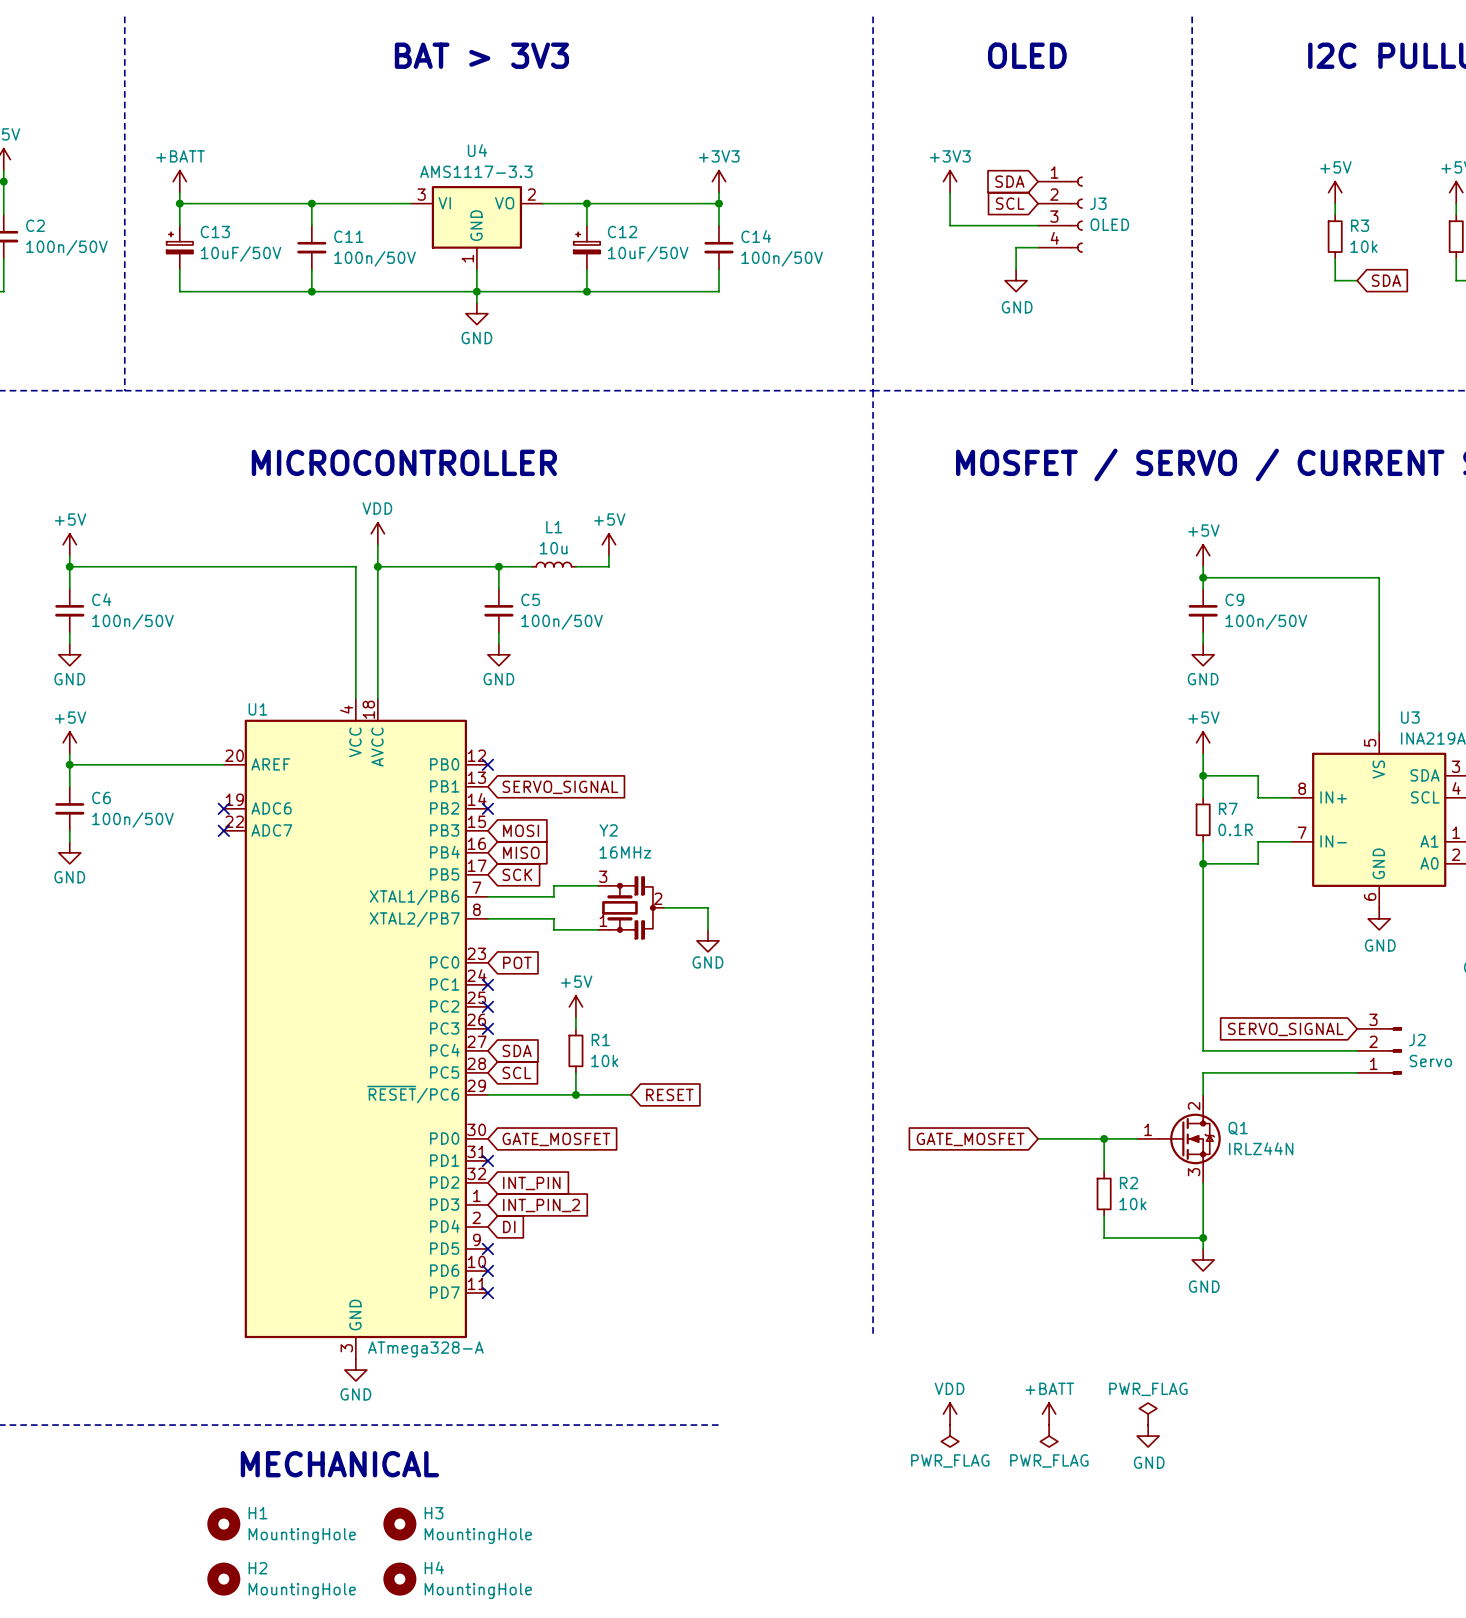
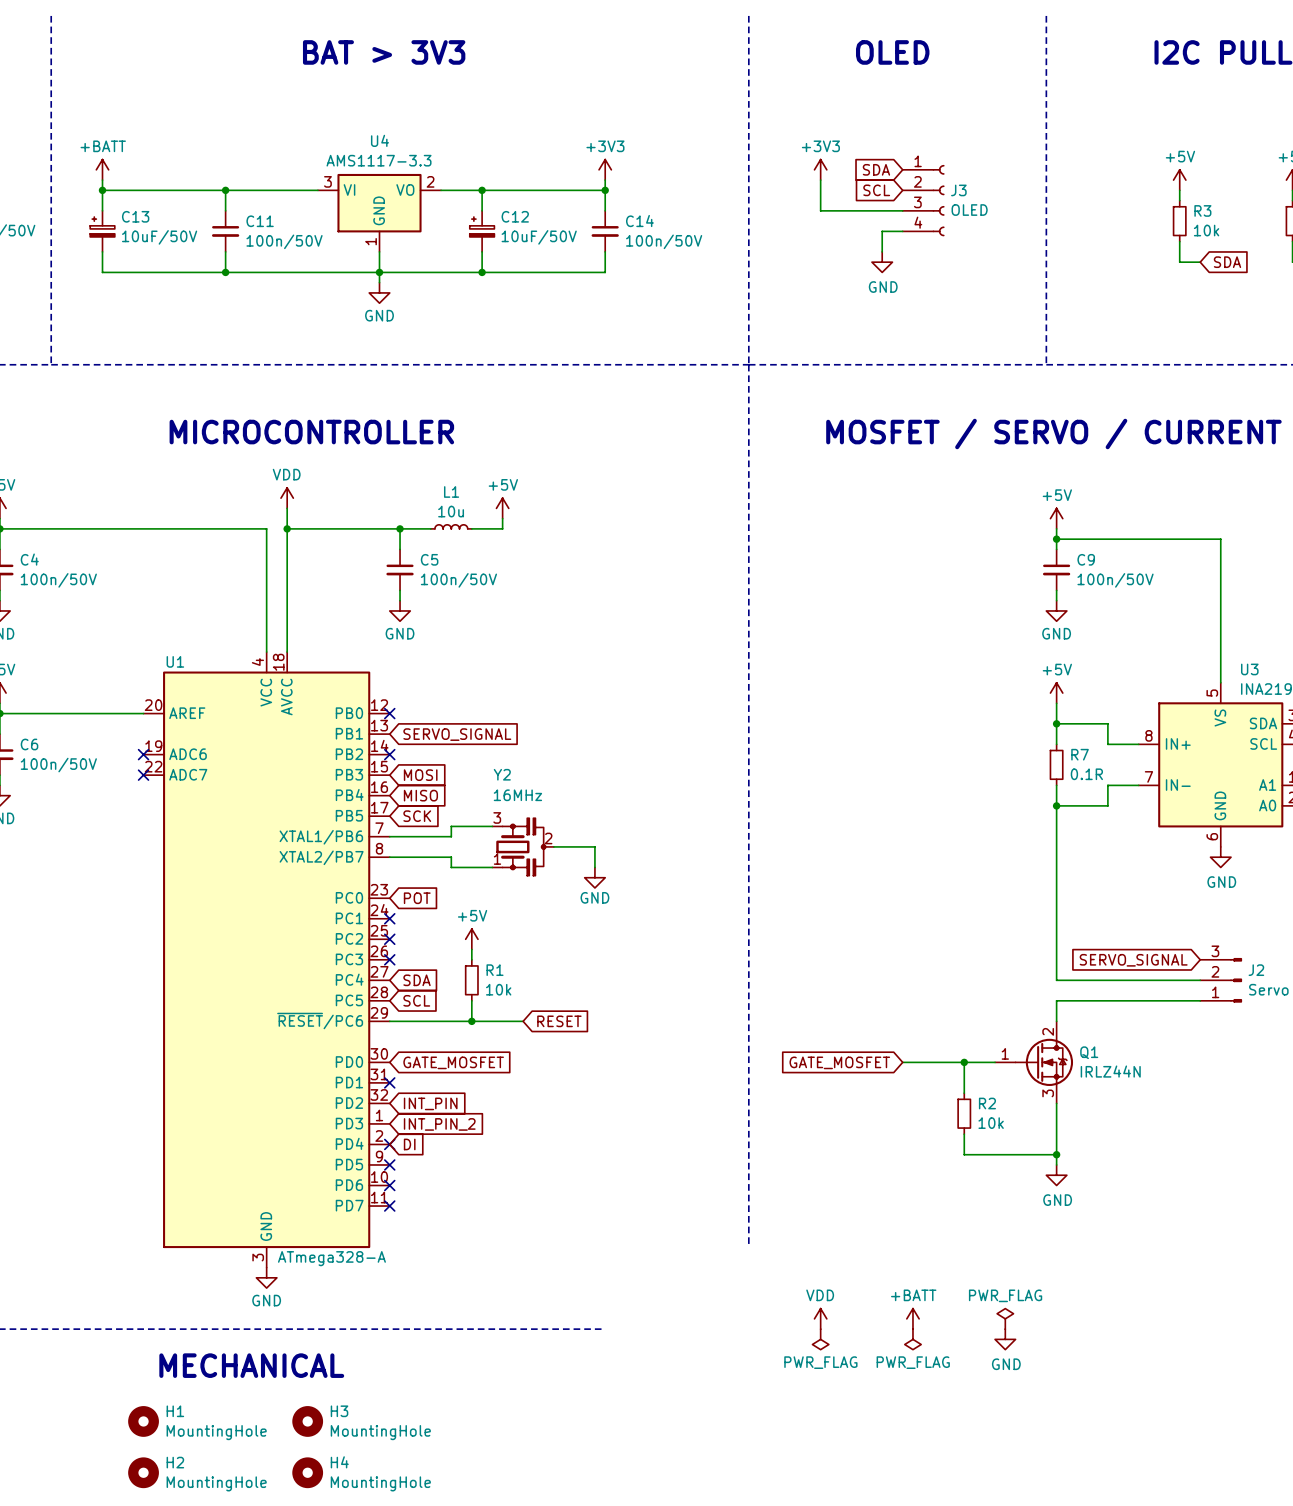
no-connect mark: none -> (389, 1144)

